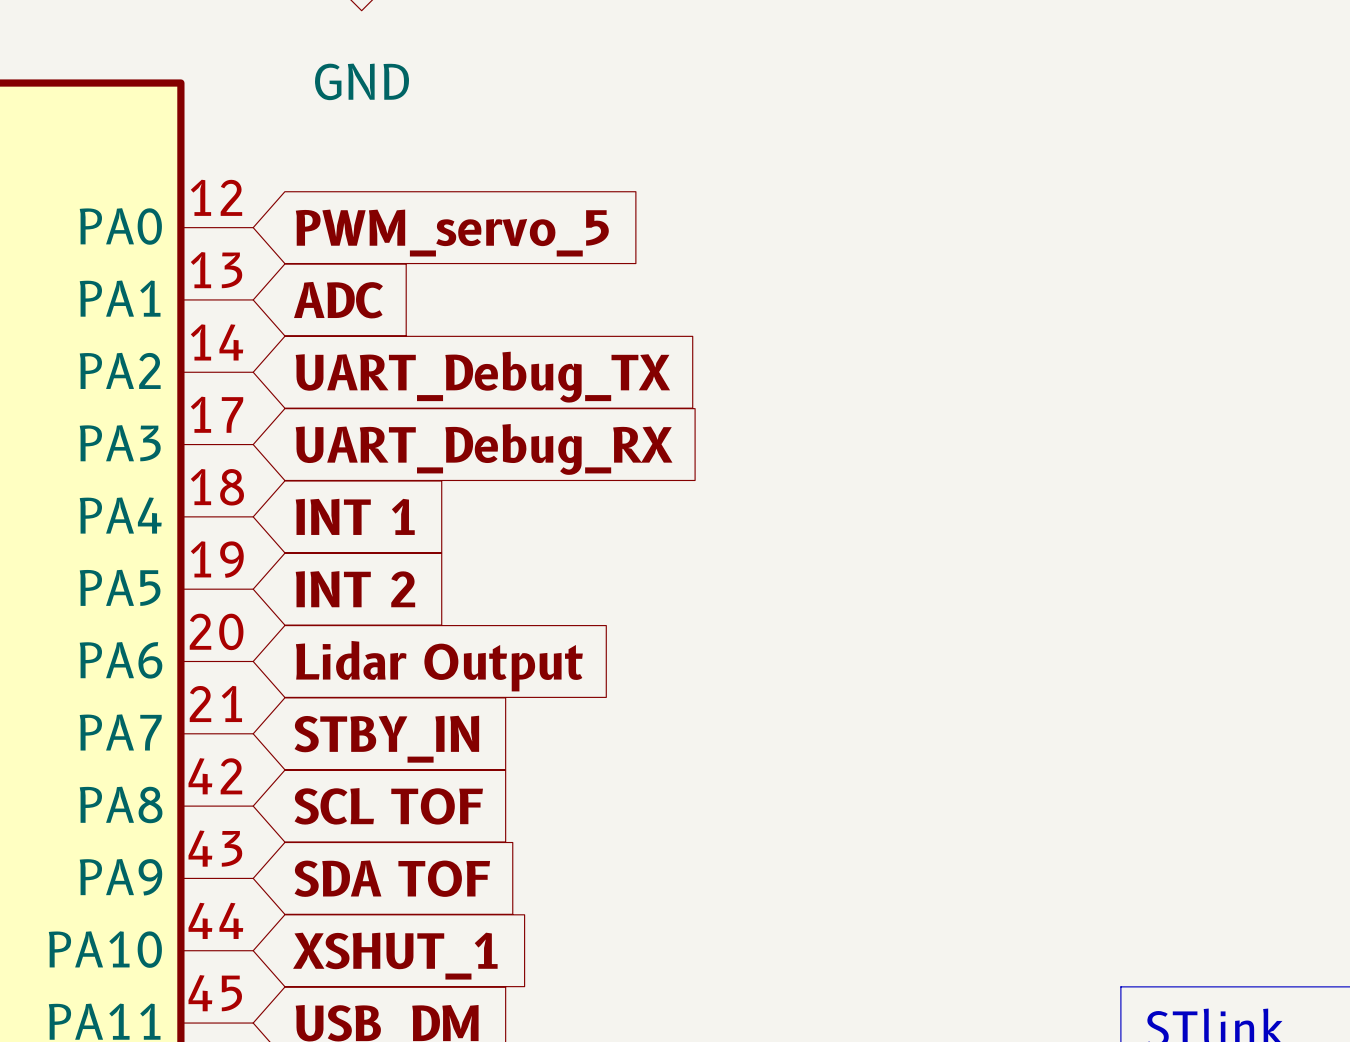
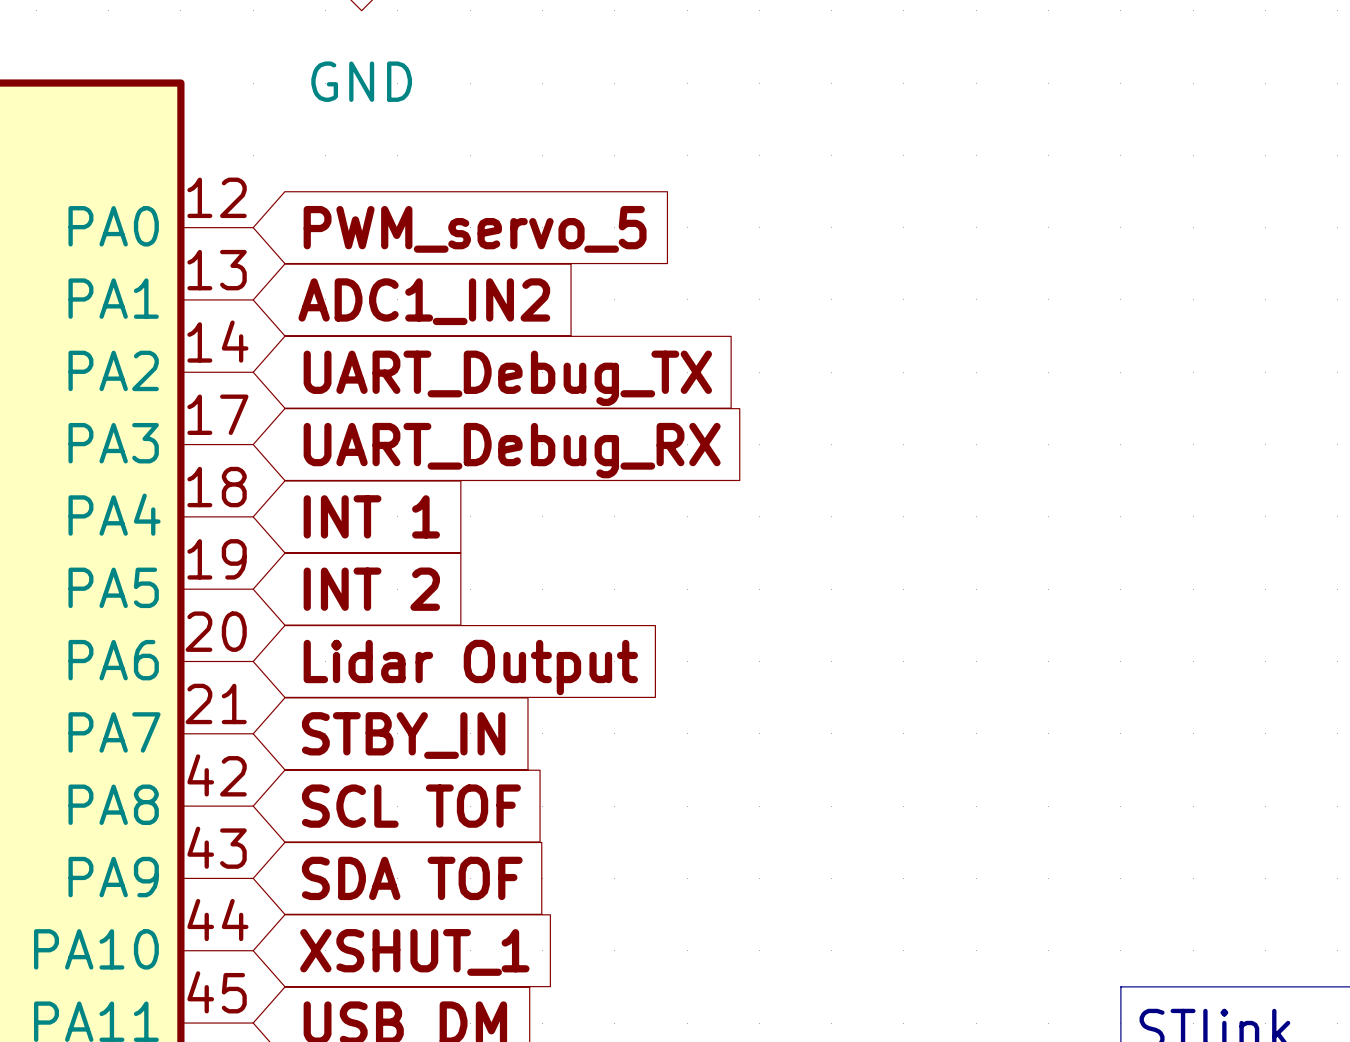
global label: ADC (338, 300) -> ADC1_IN2 (424, 301)

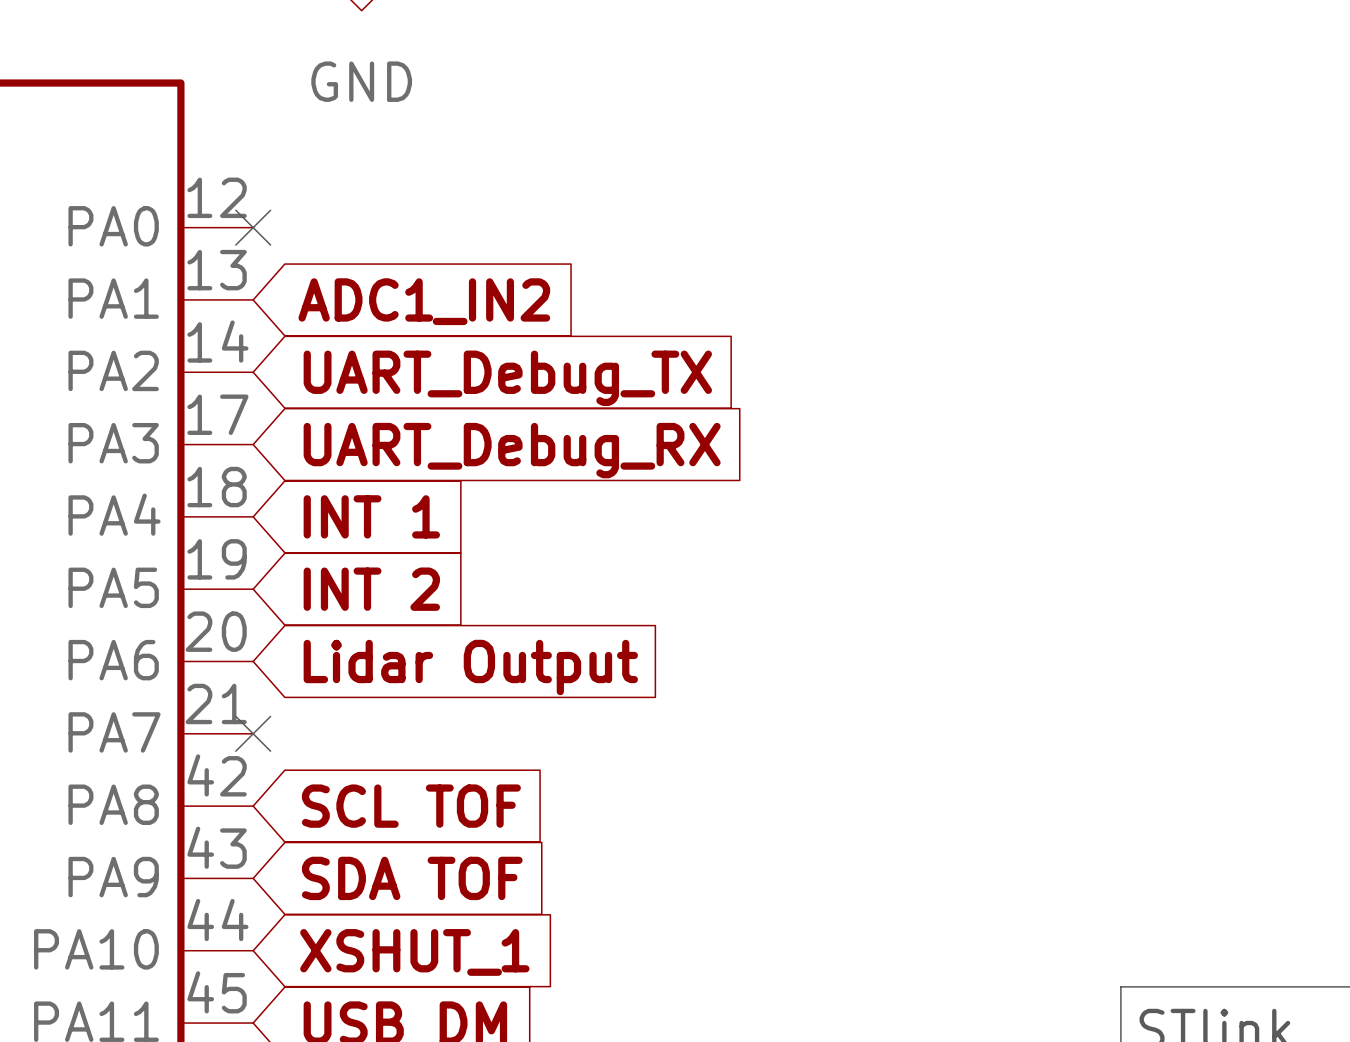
no-connect mark: none -> (253, 227)
global label: PWM_servo_5 (475, 229) -> none
no-connect mark: none -> (253, 733)
global label: STBY_IN (403, 735) -> none

